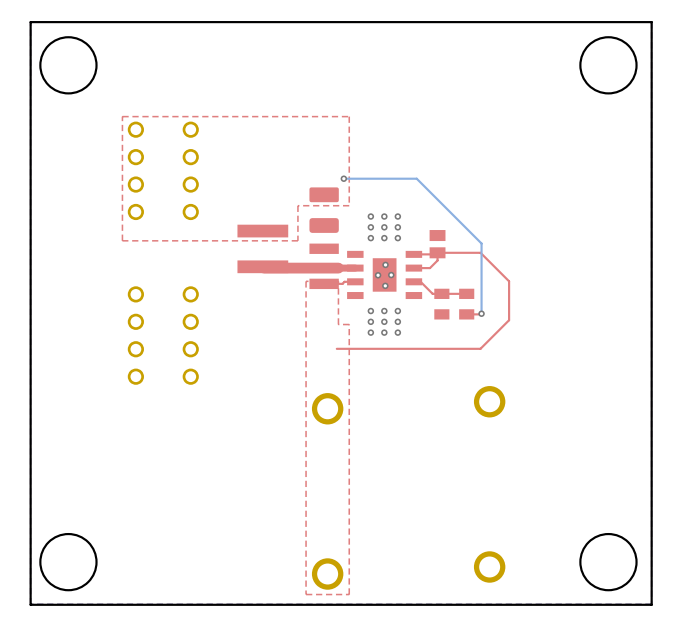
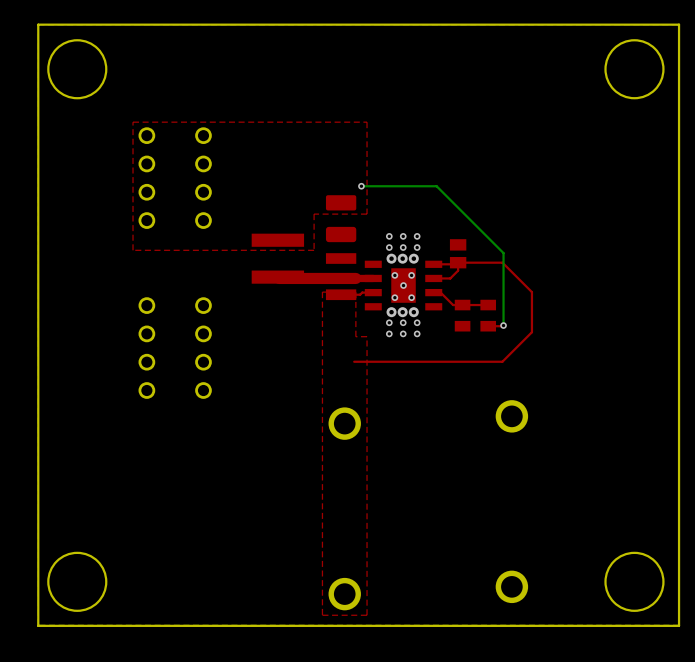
via: (370, 216) -> none
via: (384, 216) -> none
via: (397, 216) -> none
via: none -> (391, 258)
via: none -> (402, 258)
via: none -> (413, 258)
via: (385, 264) -> none
via: none -> (394, 275)
via: none -> (411, 275)
via: none -> (403, 285)
via: (378, 275) -> none
via: (391, 275) -> none
via: (385, 285) -> none
via: none -> (394, 297)
via: none -> (411, 297)
via: none -> (391, 312)
via: none -> (402, 312)
via: none -> (413, 312)
via: (370, 332) -> none
via: (384, 332) -> none
via: (397, 332) -> none

